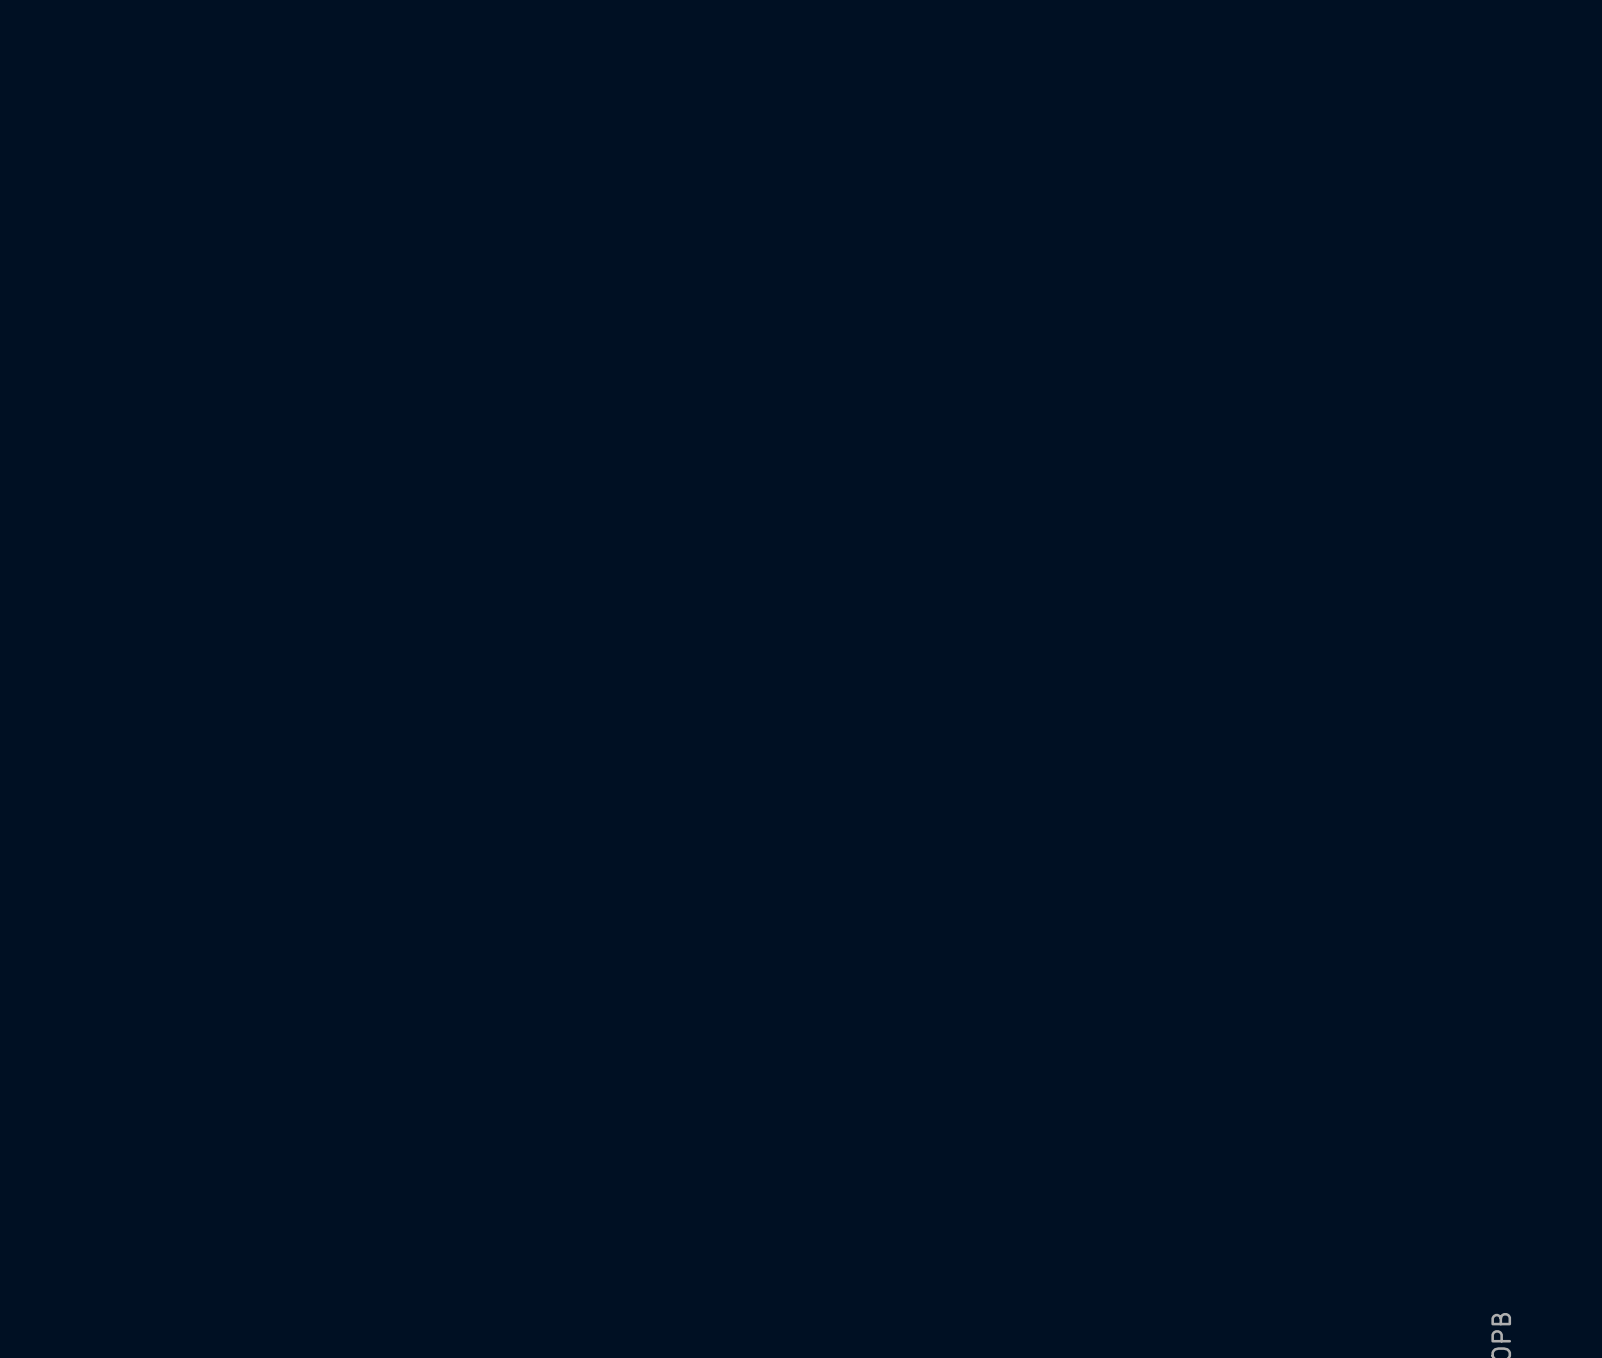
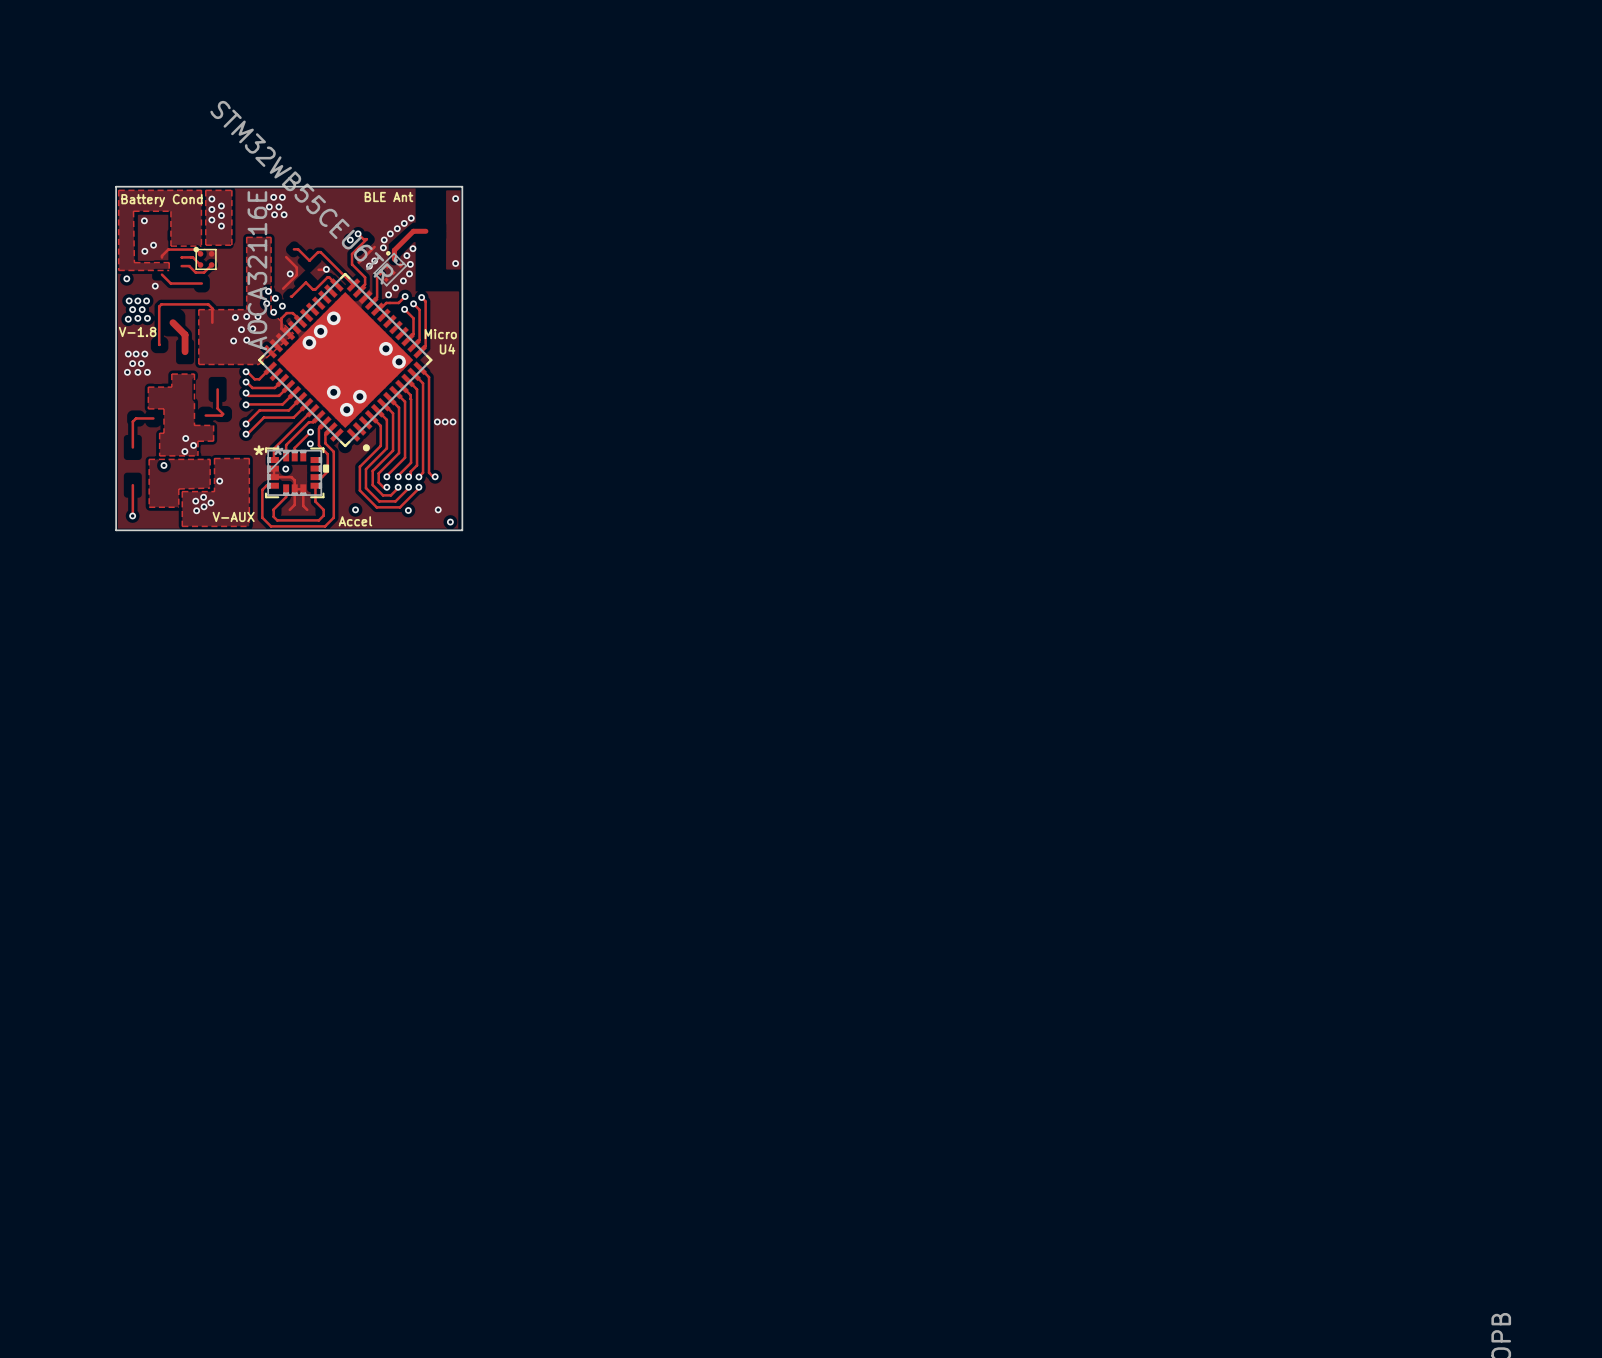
board edge: none -> (116, 186) (462, 186) (462, 530) (116, 530) (116, 186)
zone outline: none -> (118, 190) (201, 190) (201, 246) (170, 246) (170, 211) (133, 211) (134, 262) (169, 262) (169, 270) (118, 270) (118, 190)
zone outline: none -> (205, 190) (205, 245) (231, 245) (231, 190) (205, 190)
via: none -> (273, 197)
via: none -> (282, 197)
text: none -> BLE Ant (388, 197)
via: none -> (455, 198)
via: none -> (211, 199)
text: none -> Battery Cond (161, 200)
via: none -> (221, 206)
via: none -> (269, 206)
via: none -> (278, 206)
via: none -> (211, 209)
via: none -> (274, 214)
via: none -> (284, 214)
via: none -> (221, 215)
via: none -> (411, 218)
via: none -> (211, 219)
via: none -> (144, 220)
via: none -> (404, 223)
via: none -> (221, 226)
via: none -> (397, 228)
track: none -> (425, 231) (413, 231) (394, 250) (394, 259)
track: none -> (358, 233) (363, 239) (366, 239) (352, 253) (352, 264) (365, 277) (365, 284) (359, 291)
via: none -> (358, 233)
via: none -> (390, 233)
zone outline: none -> (246, 237) (246, 309) (198, 309) (198, 364) (258, 364) (293, 334) (271, 311) (271, 237) (246, 237)
via: none -> (350, 239)
via: none -> (384, 239)
via: none -> (153, 245)
track: none -> (374, 246) (359, 262)
via: none -> (383, 247)
via: none -> (412, 248)
track: none -> (293, 249) (298, 249) (309, 260) (318, 252) (320, 252) (353, 285)
via: none -> (144, 251)
track: none -> (200, 253) (196, 249) (168, 249) (161, 257)
via: none -> (406, 255)
track: none -> (181, 257) (192, 257) (200, 264)
track: none -> (286, 257) (296, 267) (296, 275) (283, 288)
part: none -> AOCA32116E (204, 258)
via: none -> (374, 260)
via: none -> (455, 263)
track: none -> (211, 264) (204, 272) (195, 272) (189, 266) (181, 266)
via: none -> (410, 264)
via: none -> (369, 266)
part: none -> (390, 268)
track: none -> (326, 269) (318, 269)
via: none -> (326, 269)
via: none -> (290, 273)
via: none -> (409, 273)
track: none -> (161, 274) (170, 283) (201, 283)
track: none -> (377, 276) (377, 297)
via: none -> (126, 278)
via: none -> (403, 280)
track: none -> (336, 285) (329, 277) (315, 289) (305, 282) (290, 296)
via: none -> (155, 286)
via: none -> (395, 287)
via: none -> (268, 291)
via: none -> (388, 294)
track: none -> (405, 296) (398, 302) (386, 302) (377, 309)
via: none -> (405, 296)
track: none -> (421, 297) (425, 301) (425, 346) (420, 351)
via: none -> (421, 297)
via: none -> (275, 298)
via: none -> (129, 300)
via: none -> (137, 300)
via: none -> (146, 300)
via: none -> (266, 303)
track: none -> (413, 303) (419, 309) (419, 340) (414, 345)
via: none -> (413, 303)
via: none -> (282, 306)
via: none -> (132, 309)
via: none -> (142, 309)
track: none -> (404, 309) (413, 318) (413, 334) (408, 339)
via: none -> (404, 309)
via: none -> (273, 312)
via: none -> (246, 316)
via: none -> (258, 316)
via: none -> (235, 317)
via: none -> (137, 318)
via: none -> (147, 318)
via: none -> (333, 318)
via: none -> (128, 319)
track: none -> (300, 321) (292, 313) (286, 313) (281, 318) (281, 328) (288, 333)
track: none -> (172, 322) (185, 334) (185, 351)
track: none -> (212, 322) (212, 308) (208, 304) (161, 304) (159, 306) (159, 344)
via: none -> (252, 328)
via: none -> (241, 329)
text: none -> V-1.8 (137, 331)
via: none -> (320, 331)
text: none -> Micro (440, 334)
via: none -> (233, 340)
via: none -> (246, 340)
via: none -> (309, 342)
via: none -> (385, 348)
via: none -> (128, 354)
via: none -> (136, 354)
via: none -> (144, 354)
via: none -> (399, 361)
U4: none -> STM32WB55CEU6TR (345, 362)
via: none -> (132, 363)
via: none -> (141, 363)
track: none -> (270, 368) (259, 379) (254, 379) (246, 371)
track: none -> (420, 368) (429, 377) (429, 472) (435, 476)
via: none -> (246, 371)
via: none -> (127, 372)
via: none -> (137, 372)
via: none -> (147, 372)
zone outline: none -> (171, 374) (171, 387) (148, 387) (148, 408) (163, 408) (163, 433) (159, 433) (159, 455) (197, 455) (197, 441) (213, 441) (213, 425) (194, 425) (194, 374) (171, 374)
track: none -> (414, 374) (423, 383) (423, 472) (418, 476)
track: none -> (282, 380) (274, 387) (252, 387) (246, 382)
track: none -> (408, 380) (417, 389) (417, 465) (408, 476)
via: none -> (246, 382)
track: none -> (288, 386) (279, 395) (248, 395) (246, 393)
track: none -> (401, 386) (410, 395) (411, 462) (398, 476)
track: none -> (217, 389) (217, 408) (223, 414) (205, 415)
track: none -> (294, 392) (282, 404) (246, 404)
via: none -> (333, 392)
track: none -> (395, 392) (405, 401) (405, 457) (386, 475)
via: none -> (246, 393)
via: none -> (359, 396)
track: none -> (300, 398) (288, 410) (259, 410) (246, 423)
track: none -> (389, 398) (399, 407) (399, 453) (378, 473) (378, 482) (383, 487) (386, 487)
via: none -> (246, 404)
track: none -> (306, 404) (293, 417) (263, 417) (246, 434)
track: none -> (383, 404) (393, 413) (393, 450) (372, 470) (372, 485) (383, 495) (390, 495) (398, 488)
via: none -> (346, 409)
track: none -> (312, 410) (273, 448) (273, 460)
track: none -> (377, 410) (386, 419) (386, 448) (365, 469) (365, 488) (379, 501) (395, 501) (408, 487)
track: none -> (318, 416) (313, 422) (308, 422) (286, 445) (286, 456)
track: none -> (371, 416) (380, 425) (380, 445) (359, 466) (359, 490) (376, 507) (399, 507) (418, 487)
track: none -> (153, 418) (136, 418) (132, 421) (132, 447)
via: none -> (437, 421)
via: none -> (445, 421)
via: none -> (453, 421)
track: none -> (324, 422) (318, 428) (318, 445) (327, 454) (327, 471) (322, 477) (315, 477)
via: none -> (246, 423)
track: none -> (330, 428) (325, 434) (325, 443) (333, 451) (333, 517) (325, 526) (271, 526) (262, 517) (262, 489) (266, 485) (273, 485)
track: none -> (310, 432) (294, 448) (294, 456)
via: none -> (310, 432)
via: none -> (246, 434)
via: none -> (185, 438)
via: none -> (310, 443)
via: none -> (193, 445)
via: none -> (184, 451)
zone outline: none -> (214, 458) (214, 491) (182, 491) (182, 526) (249, 526) (249, 458) (214, 458)
zone outline: none -> (149, 459) (149, 507) (178, 507) (178, 488) (210, 488) (210, 459) (149, 459)
via: none -> (163, 465)
track: none -> (273, 468) (273, 477) (291, 477) (294, 480) (294, 504) (289, 509)
via: none -> (285, 469)
part: none -> (297, 472)
via: none -> (386, 476)
via: none -> (398, 476)
via: none -> (408, 476)
via: none -> (418, 476)
via: none -> (435, 476)
via: none -> (219, 481)
track: none -> (132, 485) (132, 515)
track: none -> (315, 485) (315, 501) (323, 509) (323, 515) (318, 520) (277, 520) (273, 516) (273, 509) (286, 497) (286, 489)
via: none -> (386, 487)
via: none -> (398, 487)
via: none -> (408, 487)
via: none -> (418, 487)
track: none -> (294, 489) (303, 489) (303, 505) (307, 509)
via: none -> (203, 497)
via: none -> (195, 501)
via: none -> (211, 502)
via: none -> (204, 506)
via: none -> (355, 509)
via: none -> (438, 509)
via: none -> (196, 510)
via: none -> (408, 510)
via: none -> (132, 515)
text: none -> V-AUX (233, 516)
text: none -> Accel (355, 521)
via: none -> (450, 522)

